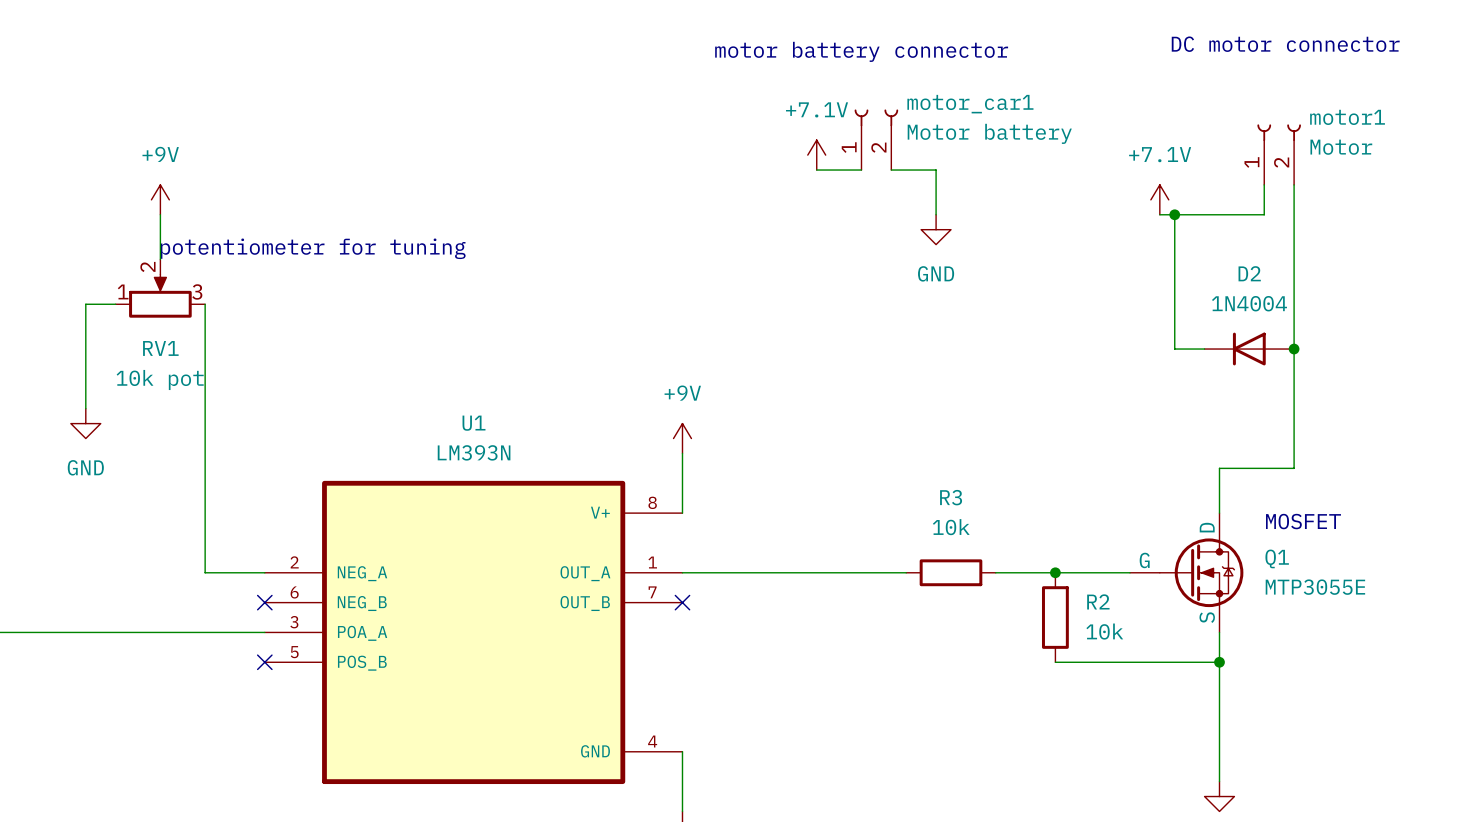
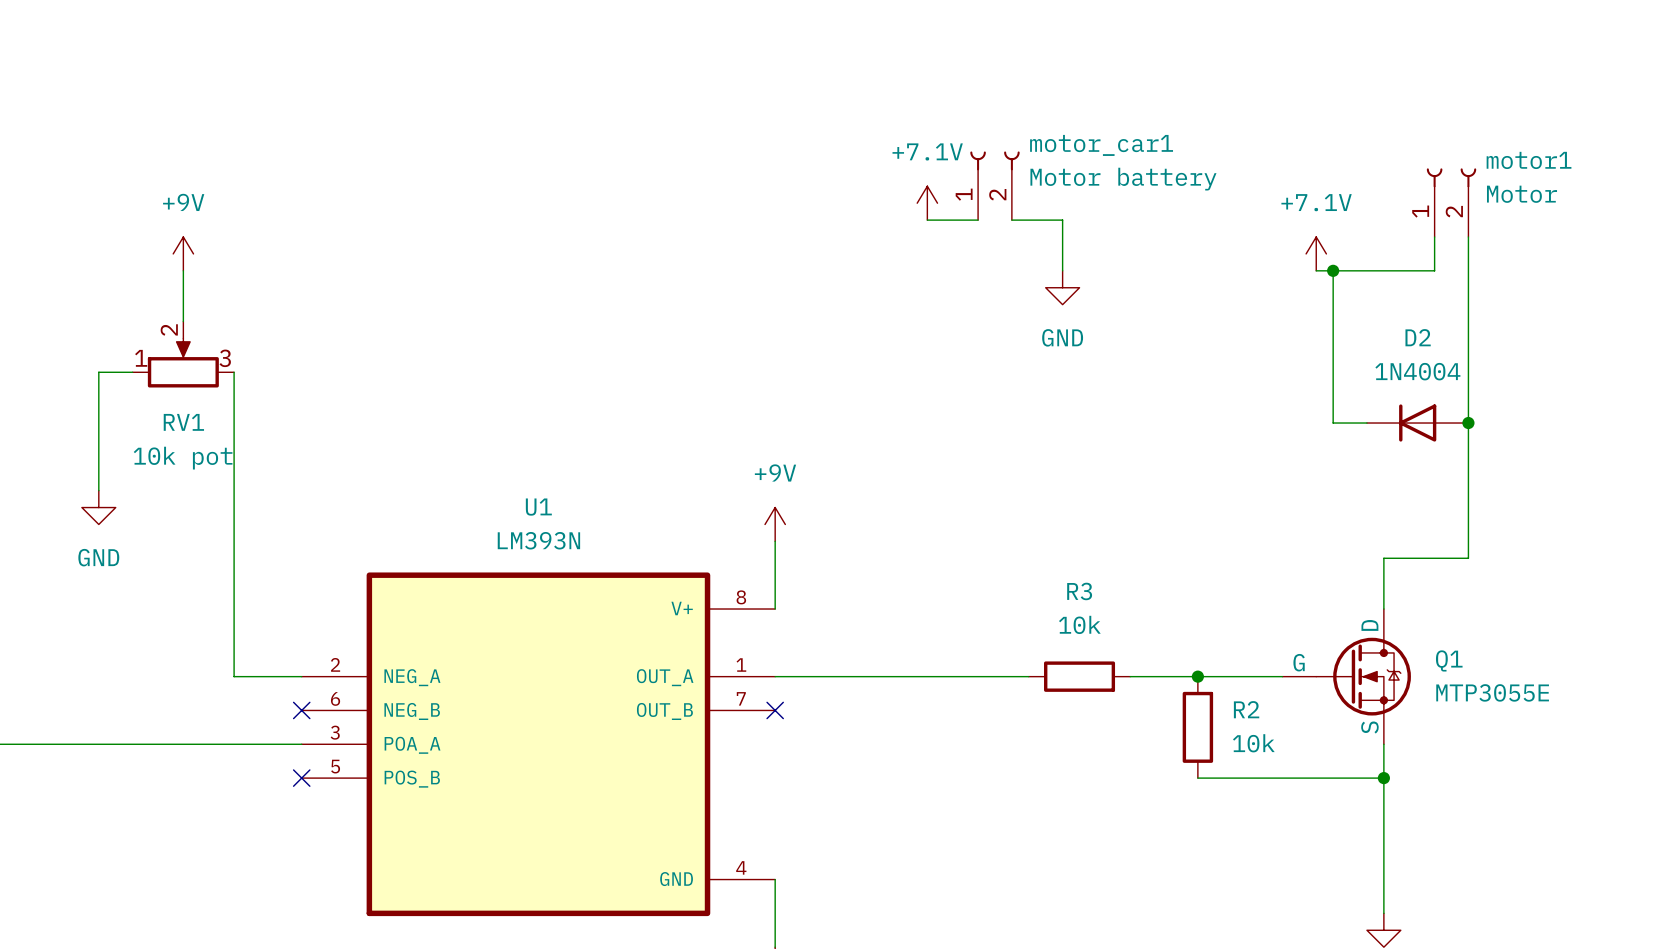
text: DC motor connector (1285, 44) -> none
text: motor battery connector (861, 51) -> none
text: potentiometer for tuning (313, 248) -> none
text: MOSFET (1303, 521) -> none

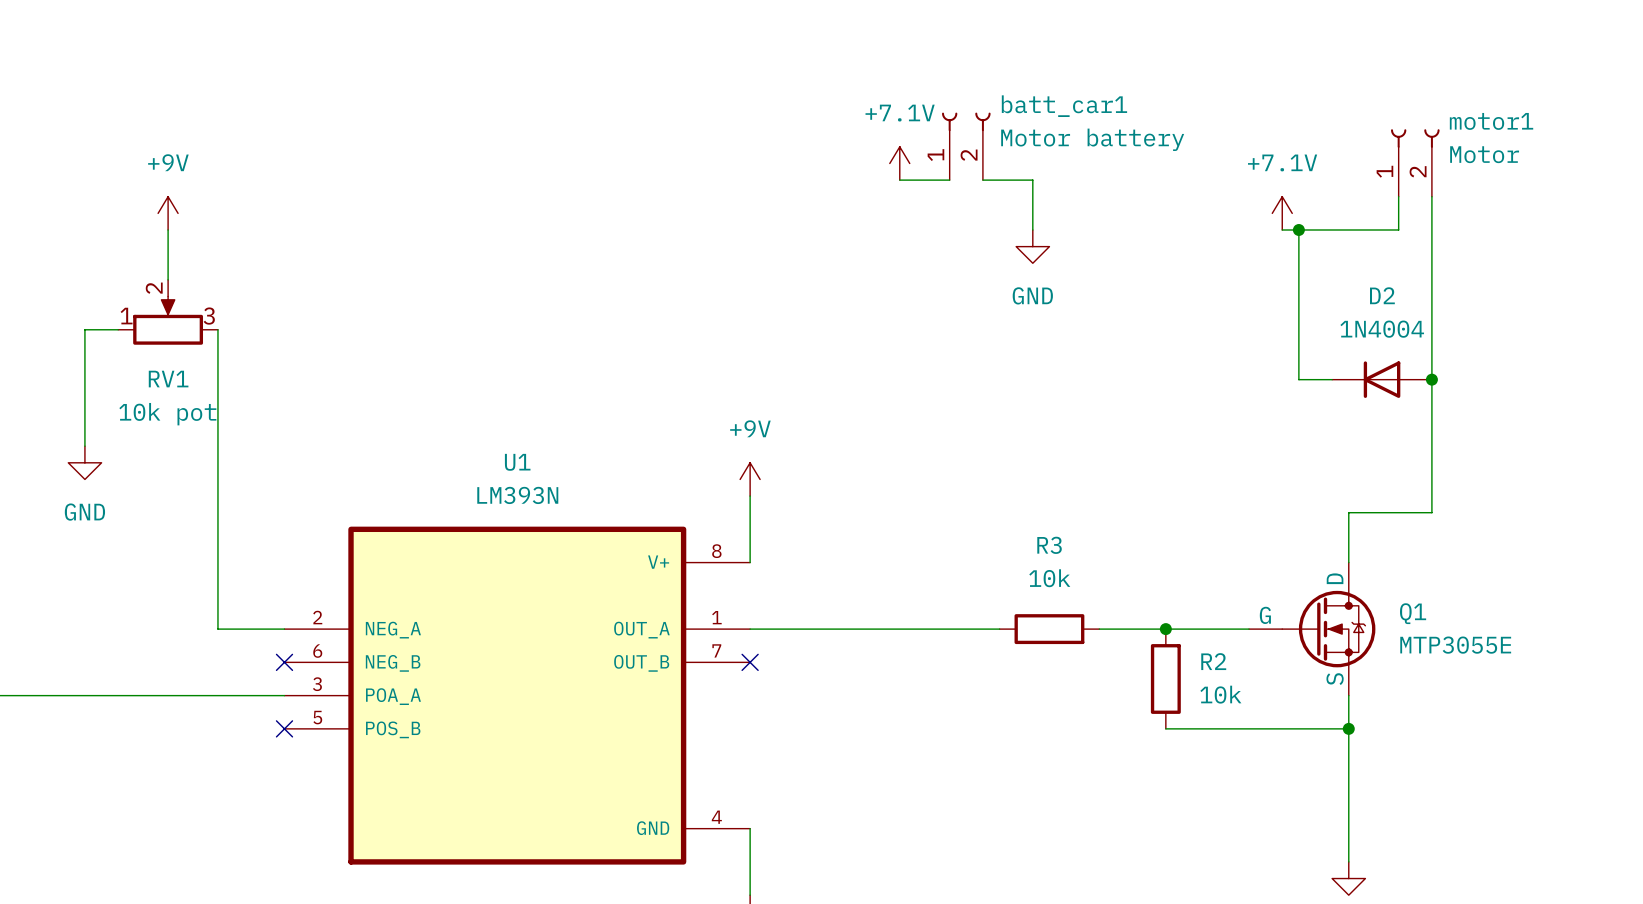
motor_car1 name: motor_car1 (1101, 145) -> batt_car1 (1064, 106)

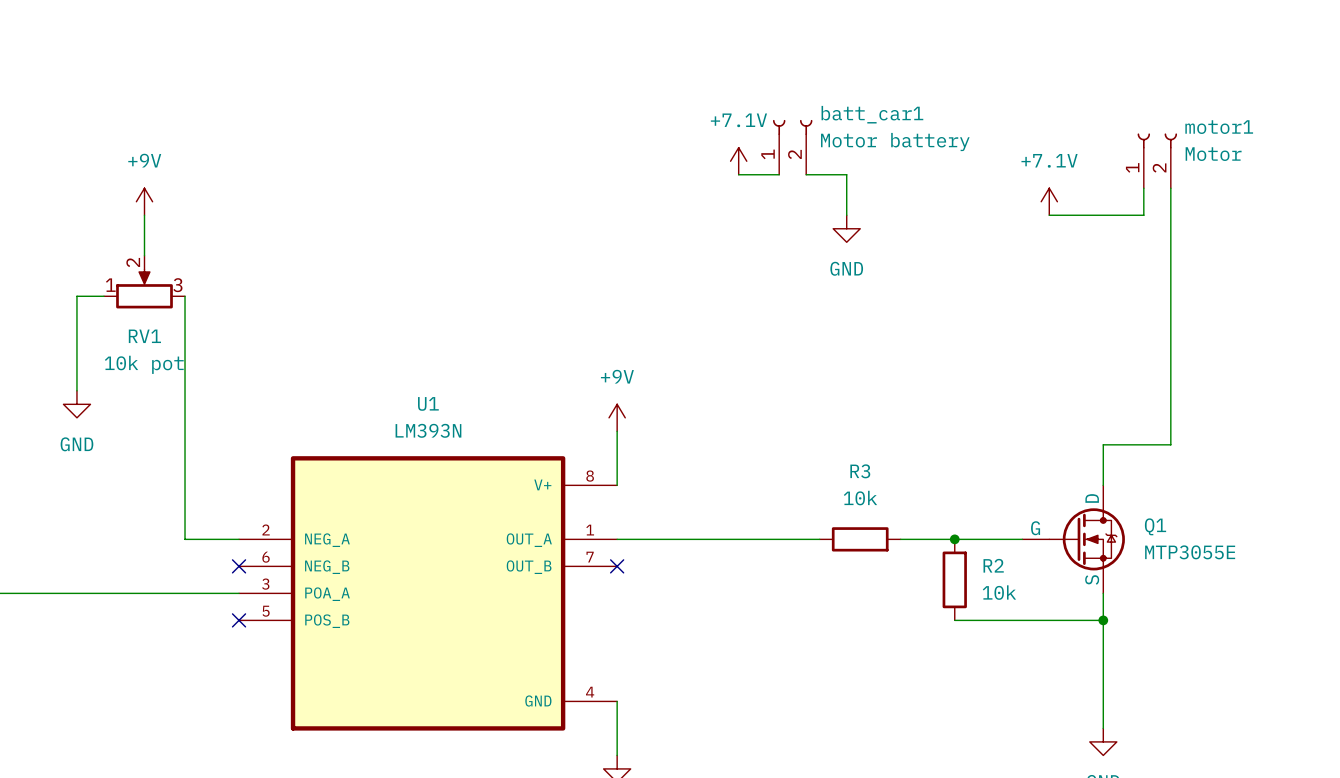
wire: (1298, 229) (1298, 379) (1332, 379) -> none
junction: (1298, 229) -> none
D2: 1N4004 (1382, 379) -> none
junction: (1431, 379) -> none

